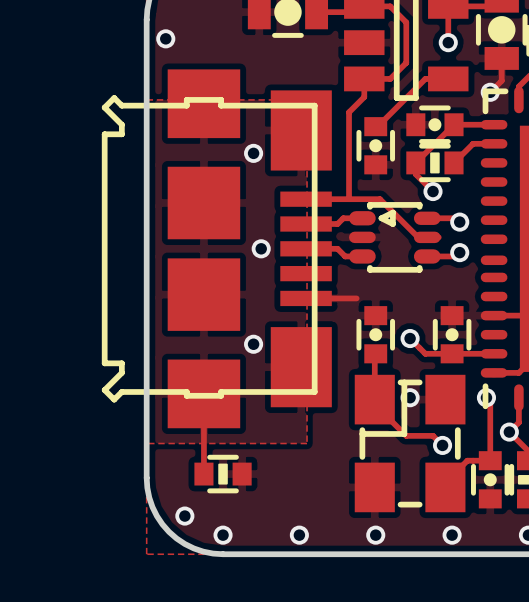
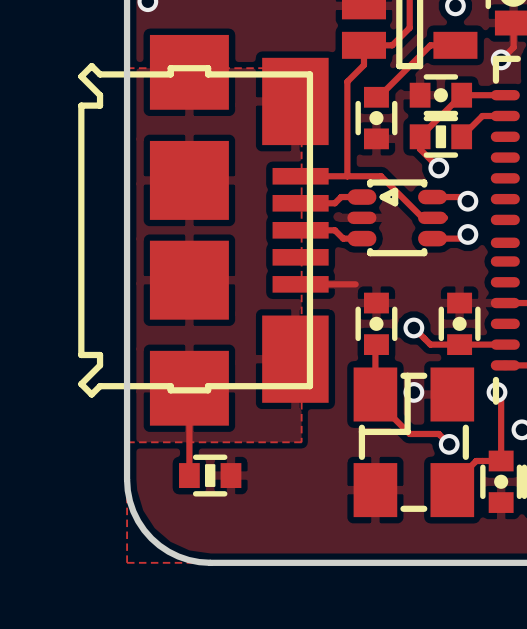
via: (253, 153) -> none
via: (261, 248) -> none
via: (253, 344) -> none
via: (184, 516) -> none
via: (223, 535) -> none
via: (299, 535) -> none
via: (375, 535) -> none
via: (452, 535) -> none

